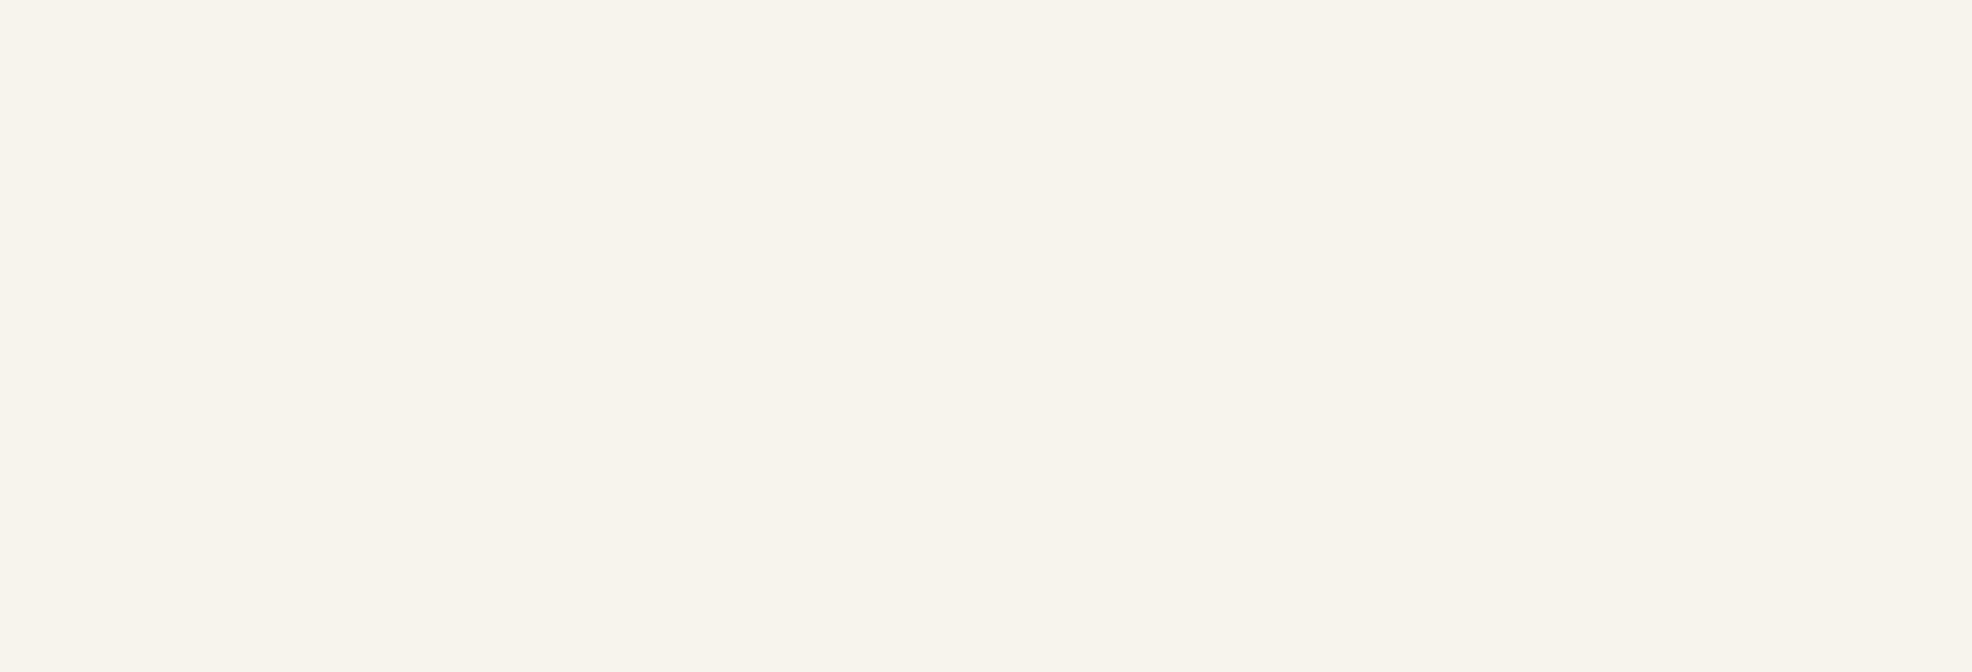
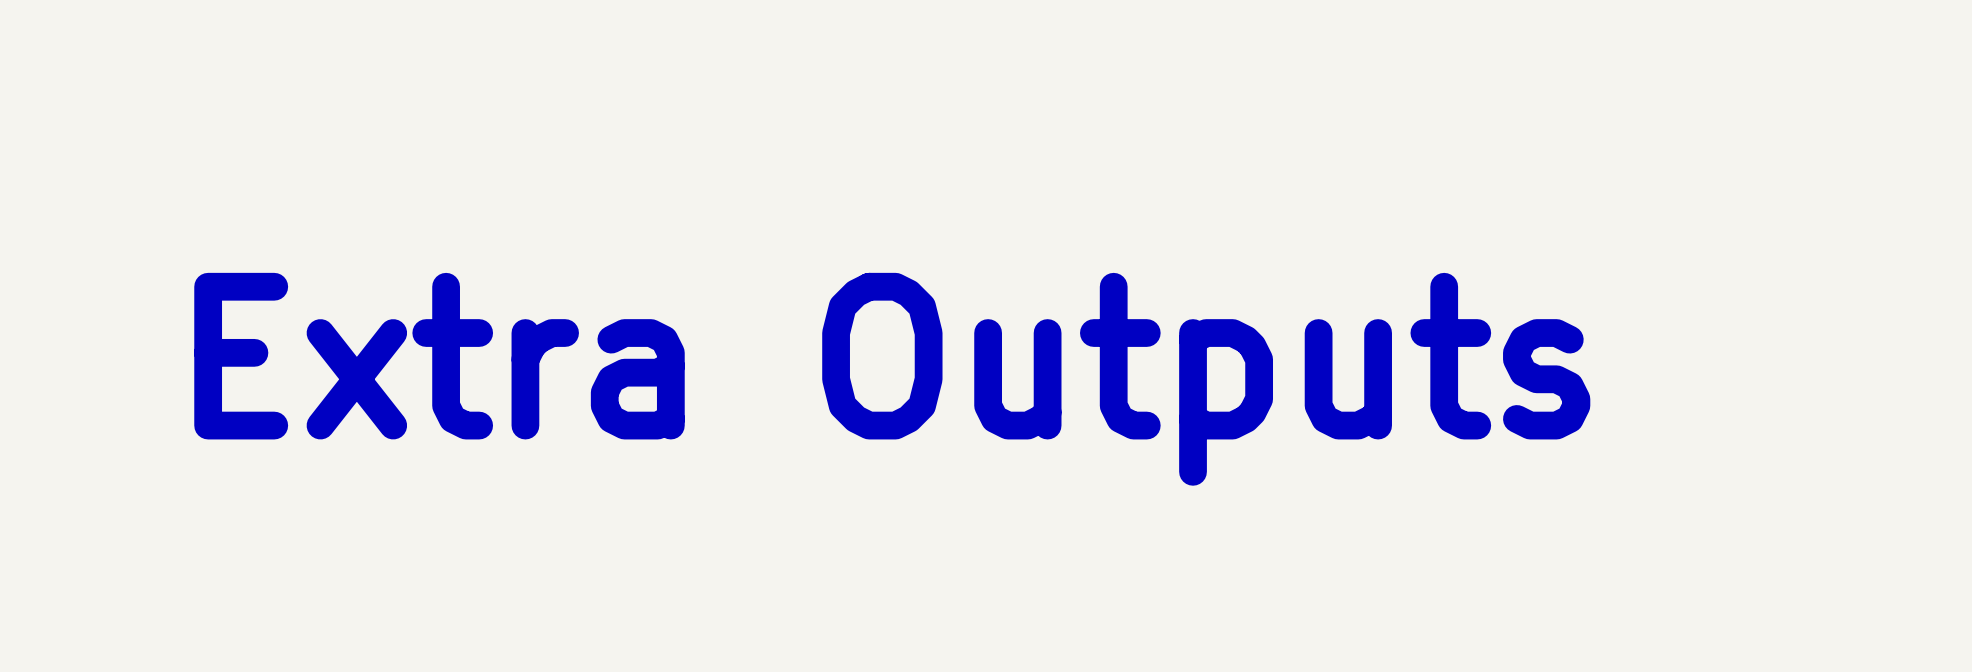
text: none -> Extra Outputs (892, 379)

